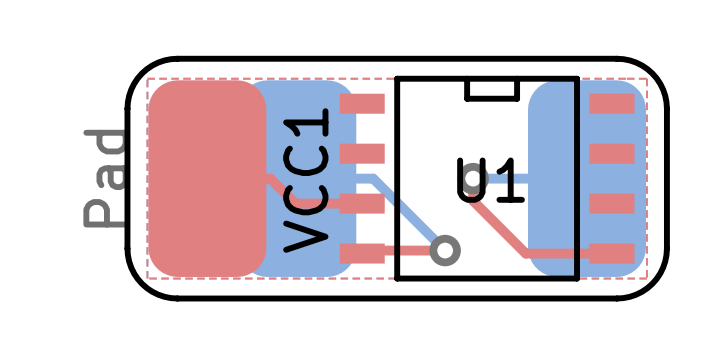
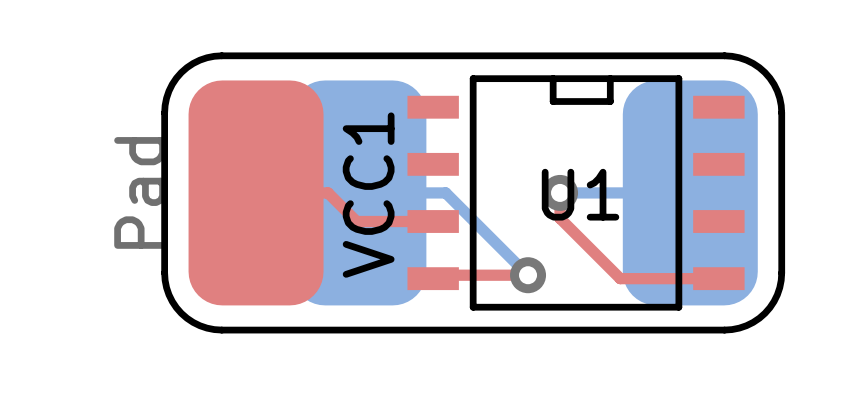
top zone outline: (147, 78) (646, 78) (646, 278) (147, 278) (147, 78) -> none

